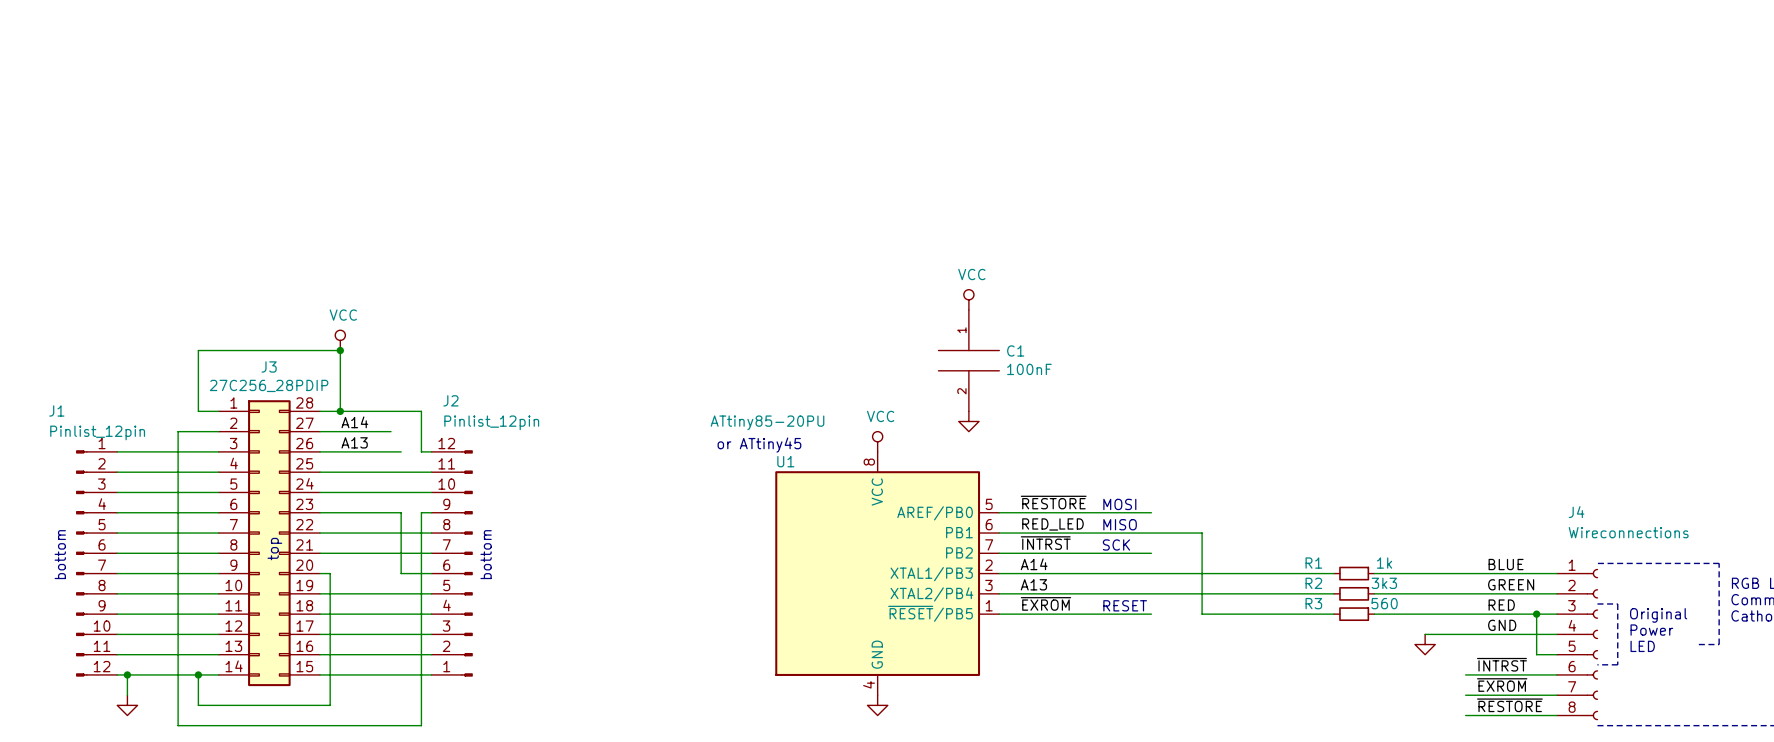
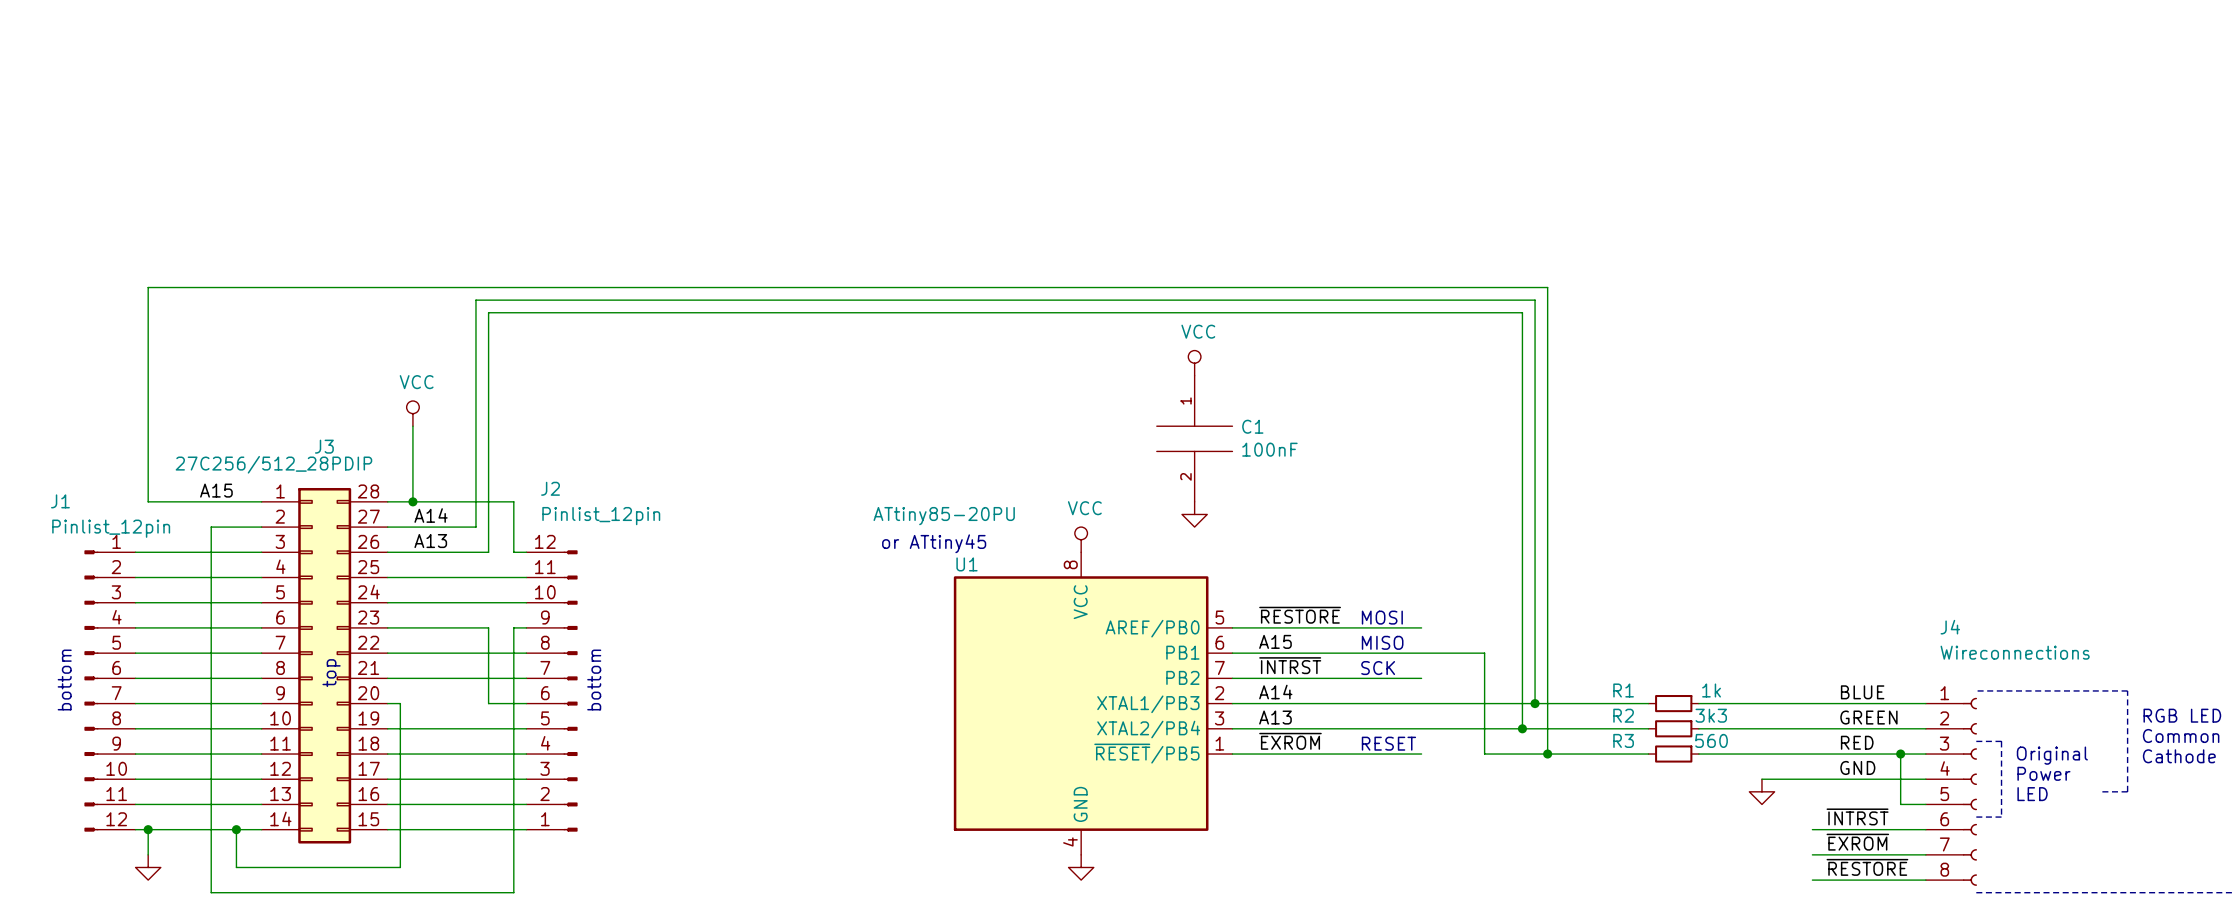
wire: (340, 350) (198, 350) (198, 411) -> (1547, 754) (1547, 287) (148, 287) (148, 501) (236, 501)
junction: (340, 350) -> none
J3 value: 27C256_28PDIP (269, 385) -> 27C256/512_28PDIP (273, 464)
label: none -> A15 (216, 490)
wire: none -> (475, 527) (475, 300) (1535, 300) (1535, 703)
wire: none -> (488, 552) (488, 312) (1522, 312) (1522, 728)
label: RED_LED (1052, 524) -> A15 (1275, 641)
junction: none -> (1535, 703)
junction: none -> (1522, 728)
junction: none -> (1547, 754)

